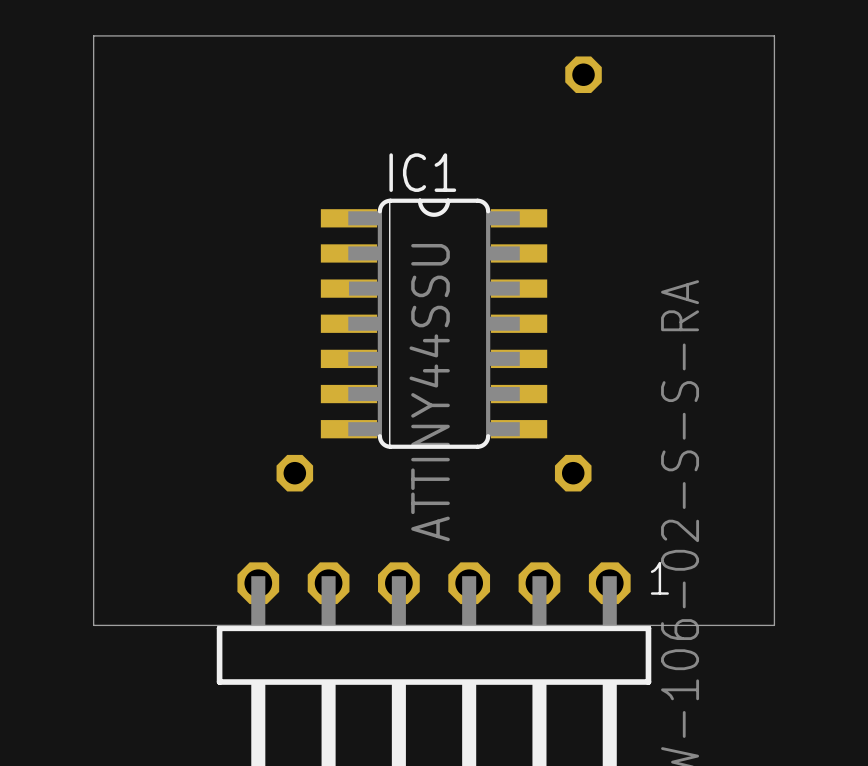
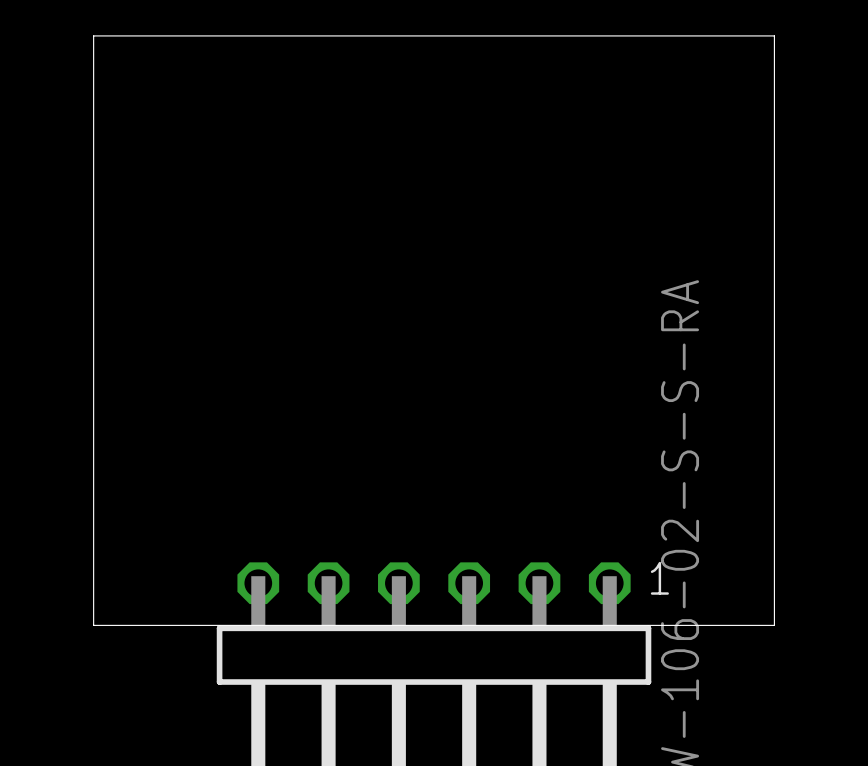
part: (583, 74) -> none
IC1: ATTINY44SSU (434, 323) -> none
part: (294, 473) -> none
part: (573, 473) -> none

